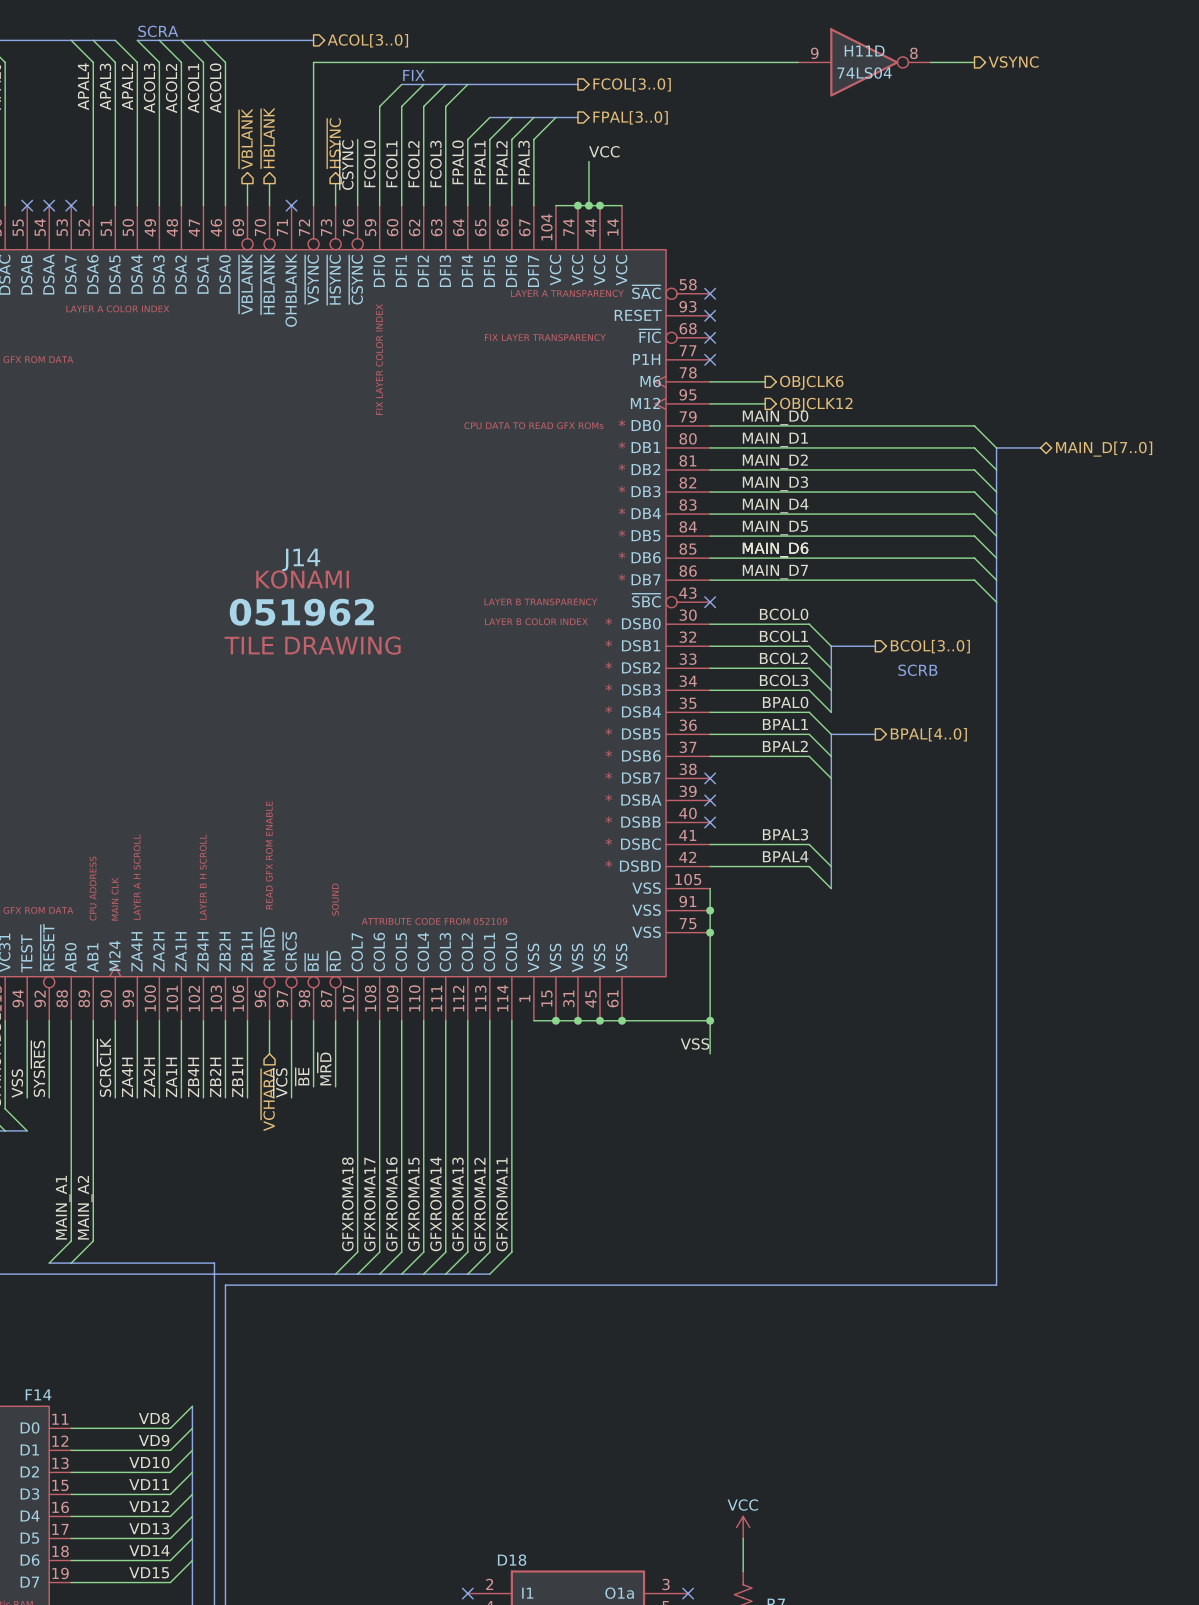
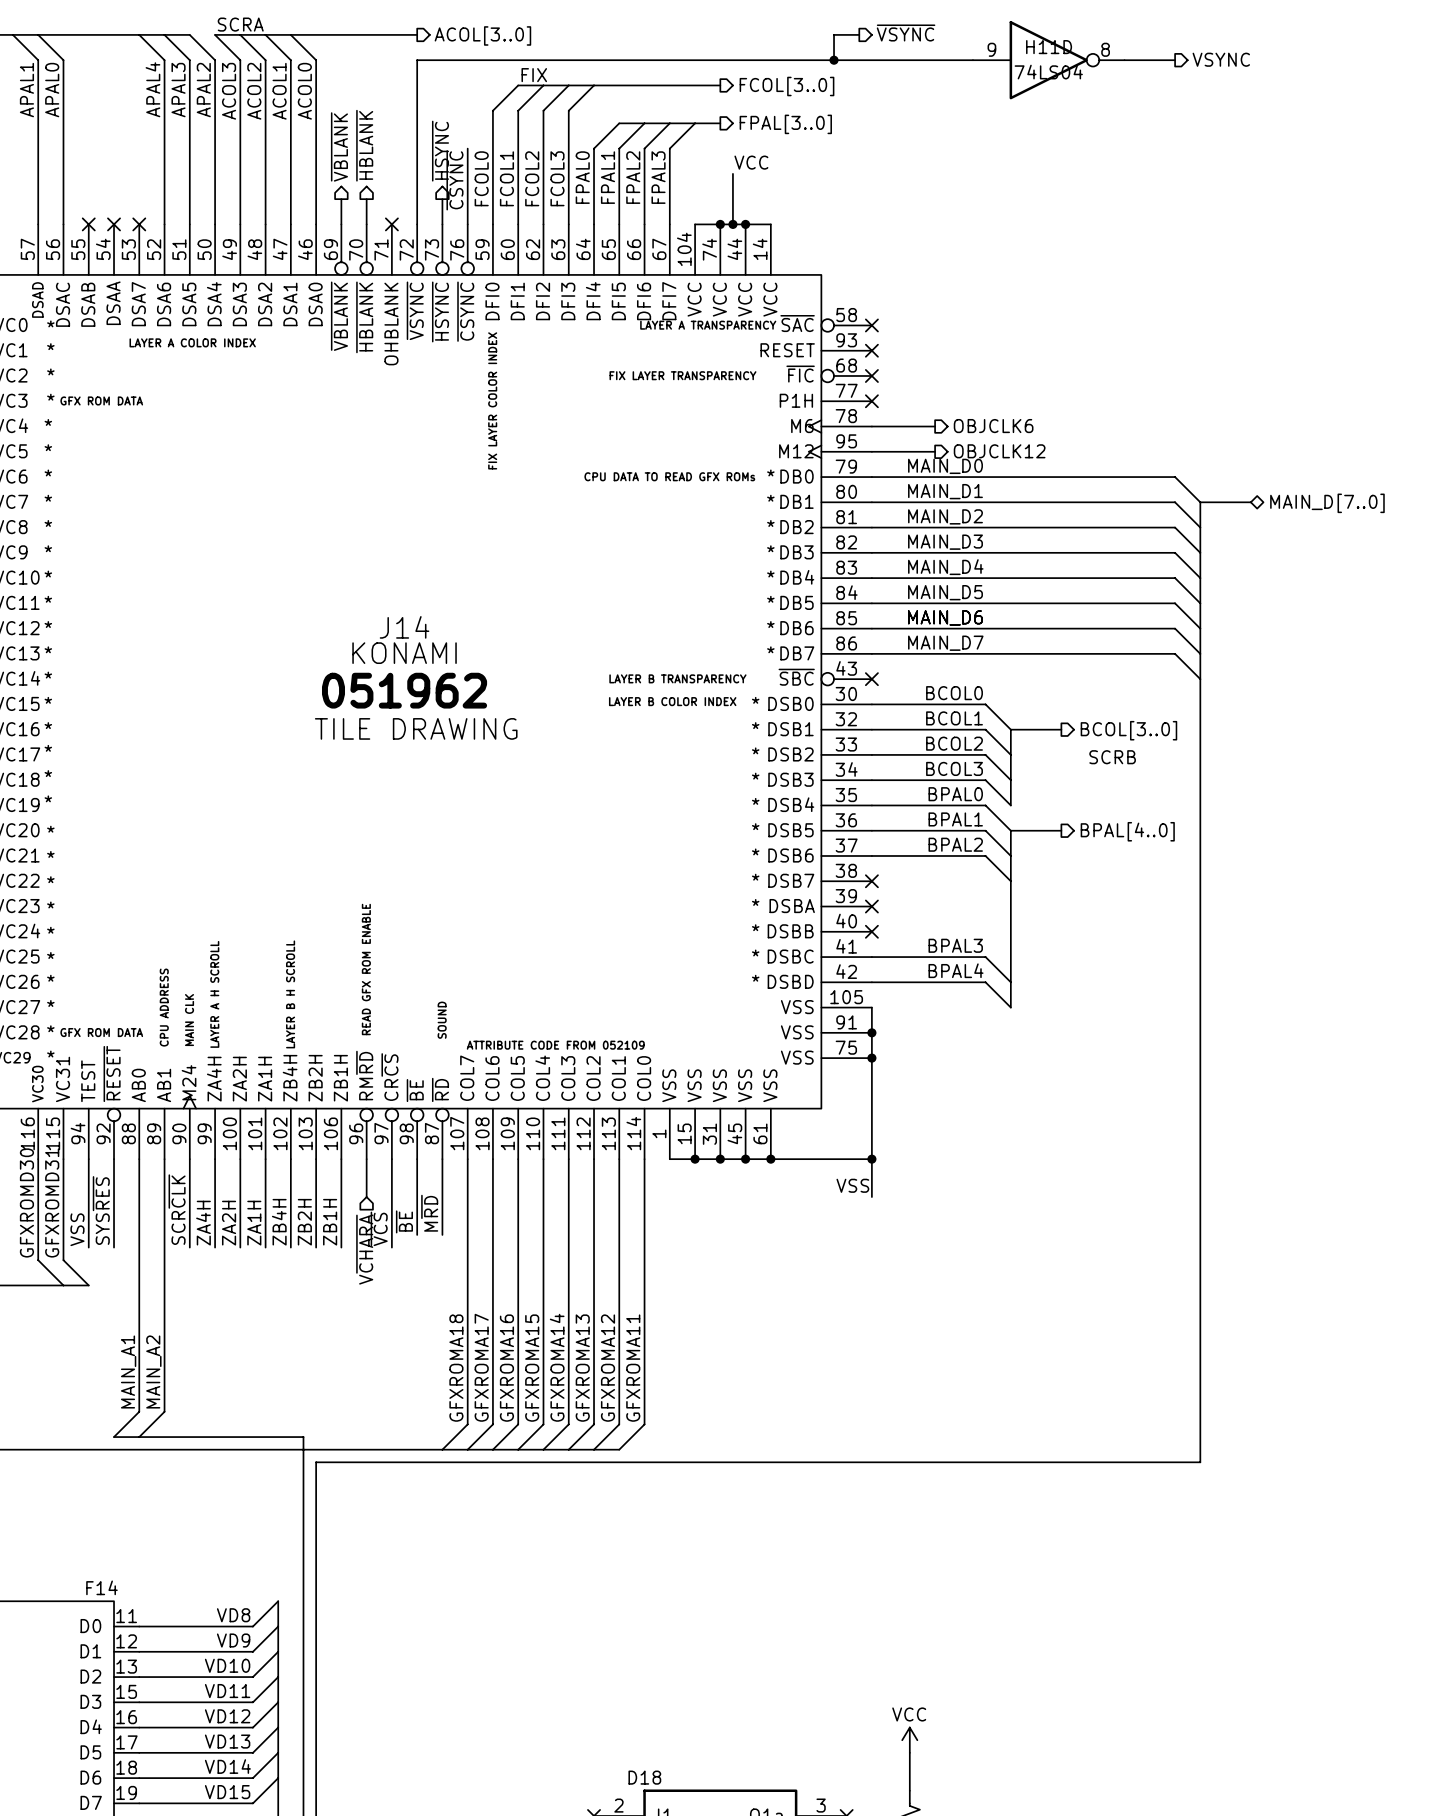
hierarchical label: none -> ~{VSYNC} (906, 33)
wire: none -> (859, 34) (834, 34) (834, 60)
junction: none -> (834, 60)

